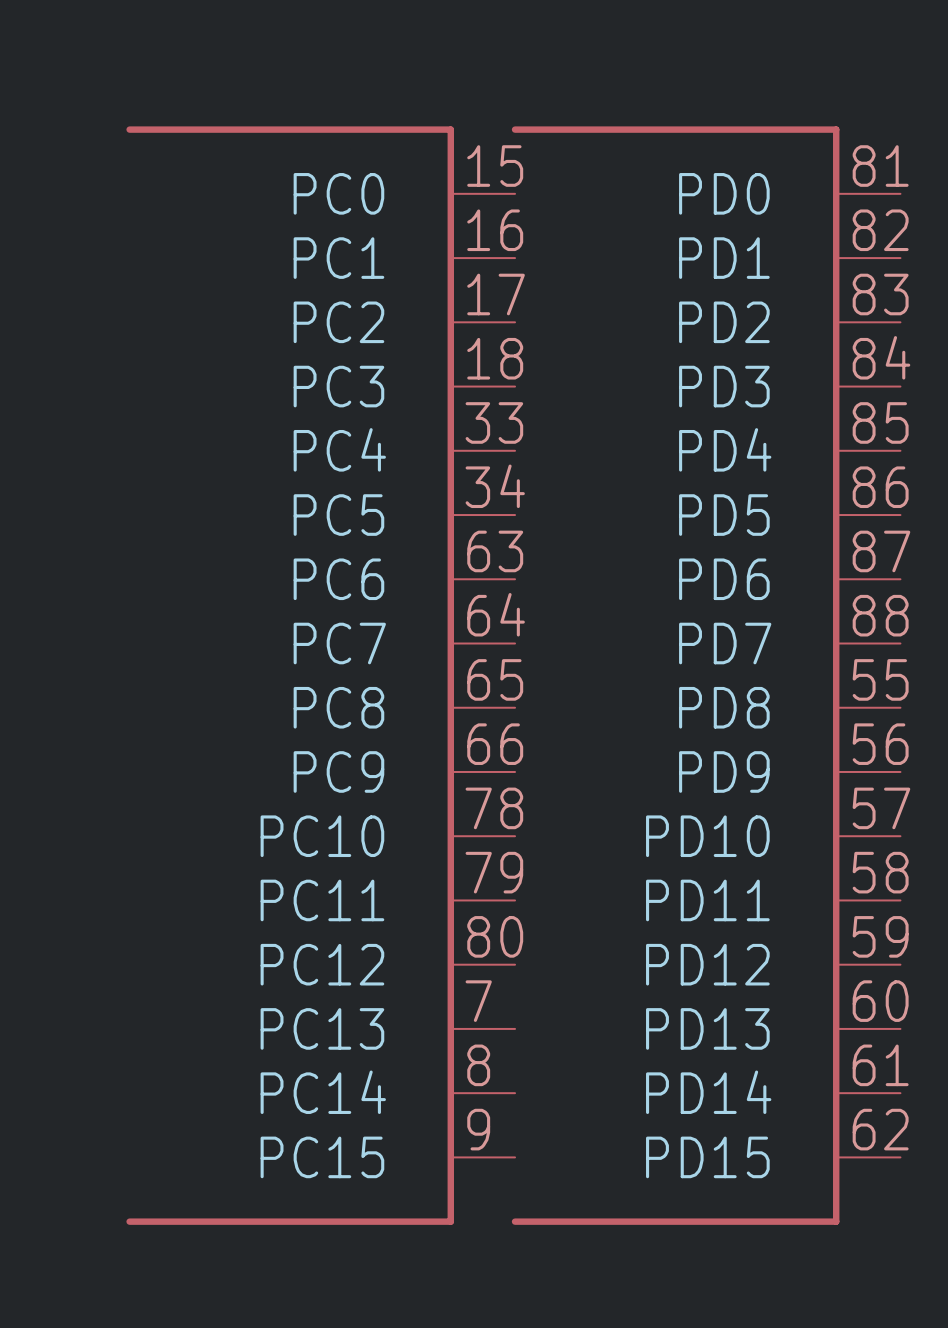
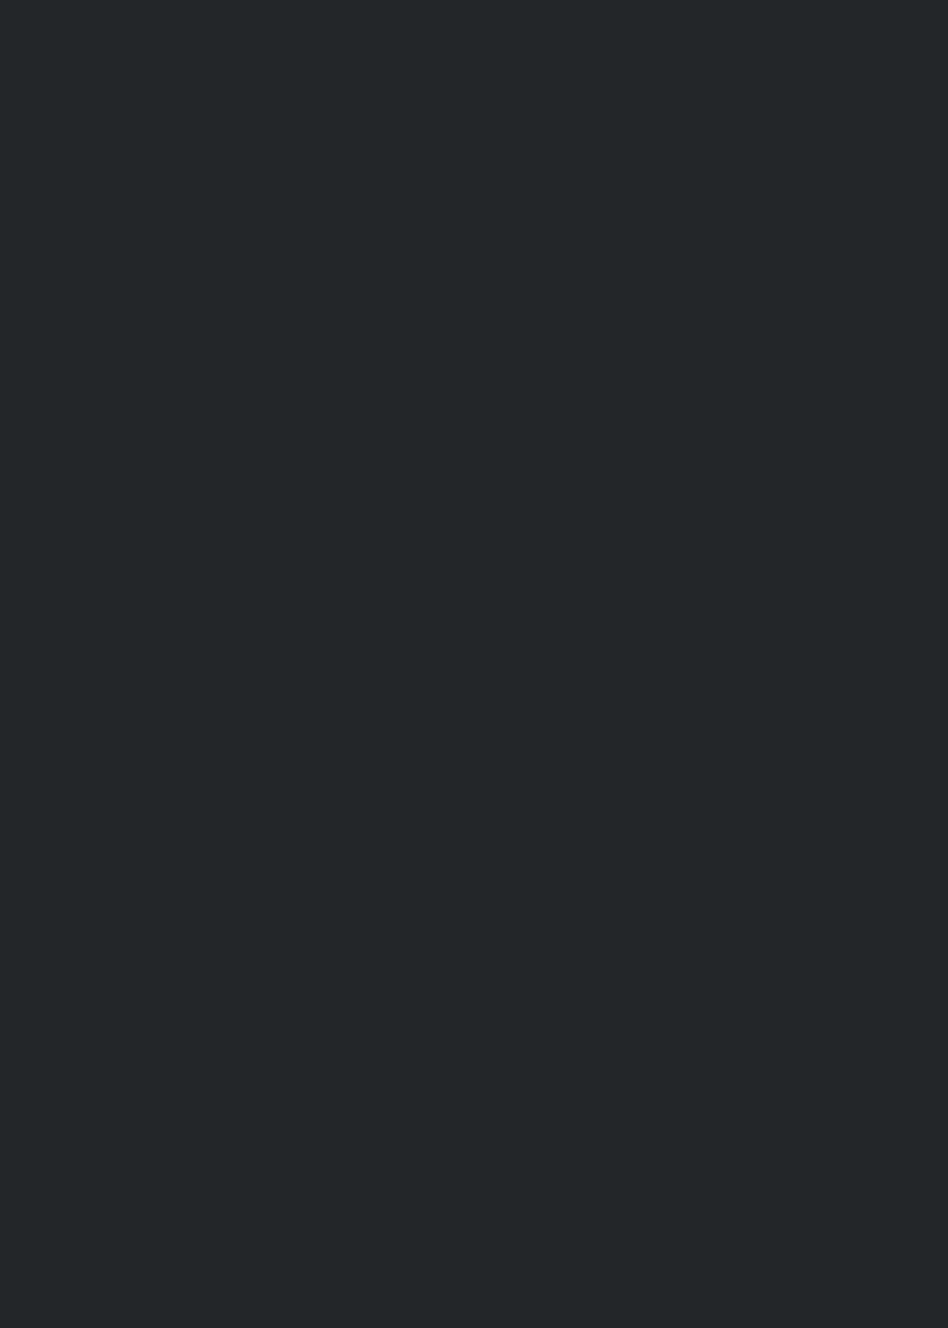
part: (320, 675) -> none
part: (706, 675) -> none

